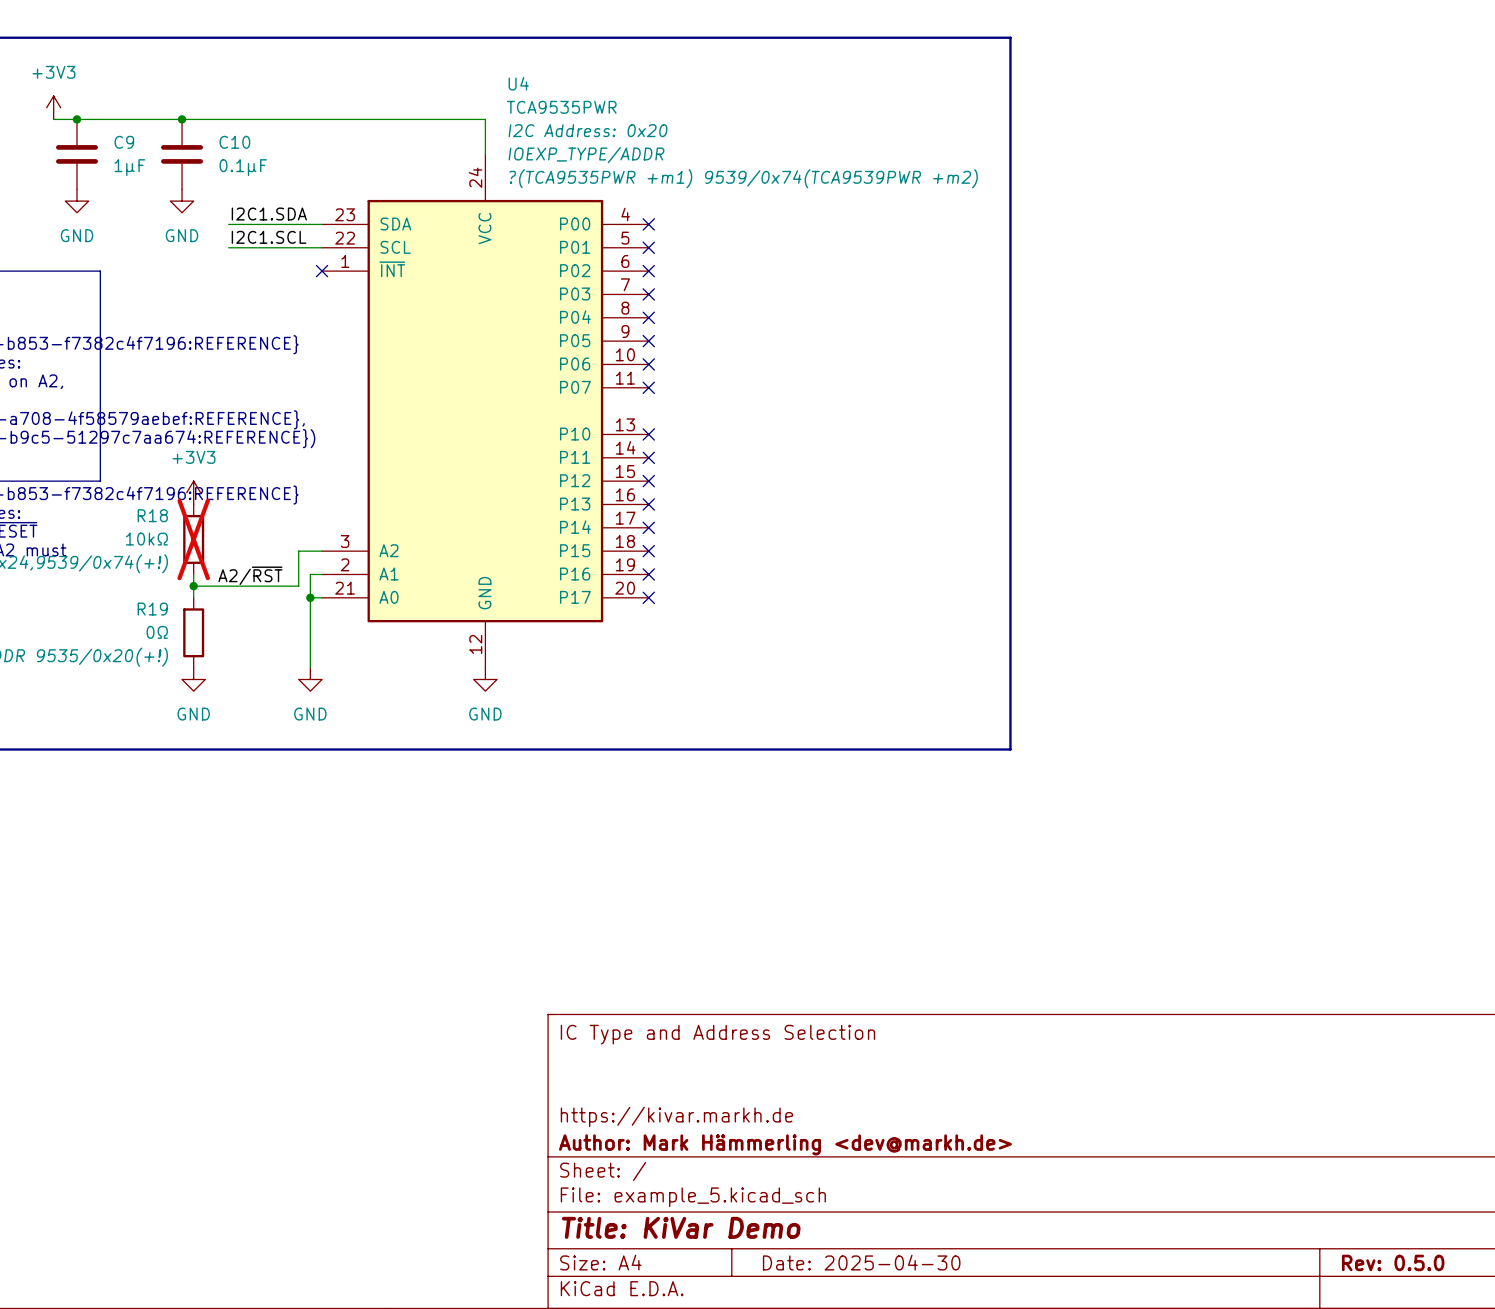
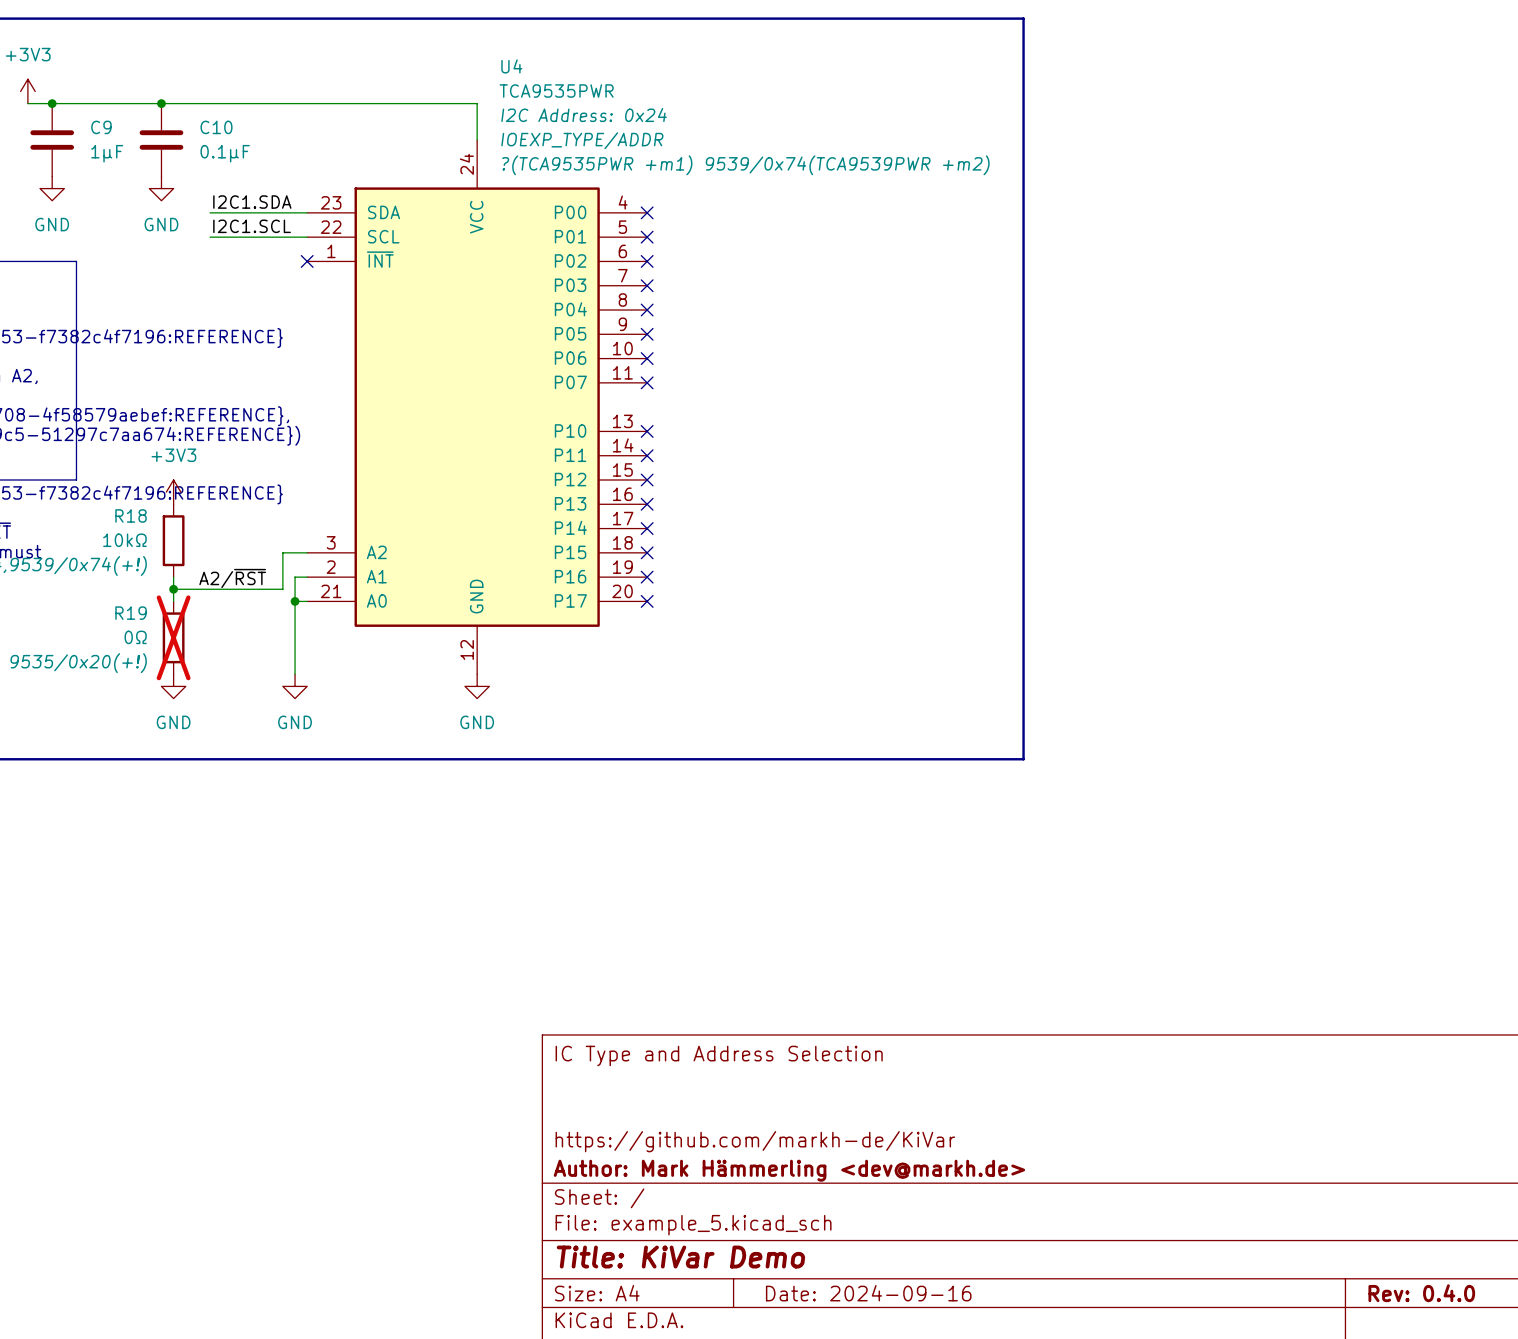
U4 text: I2C Address: 0x20 (588, 130) -> I2C Address: 0x24 (584, 114)
R18 do-not-place cross: (193, 539) -> none
R19 do-not-place cross: none -> (173, 637)
title block: https://kivar.markh.de (676, 1116) -> https://github.com/markh-de/KiVar (755, 1141)
title block: Date: 2025-04-30 (861, 1262) -> Date: 2024-09-16 (868, 1293)
title block: Rev: 0.5.0 (1393, 1262) -> Rev: 0.4.0 (1421, 1293)

